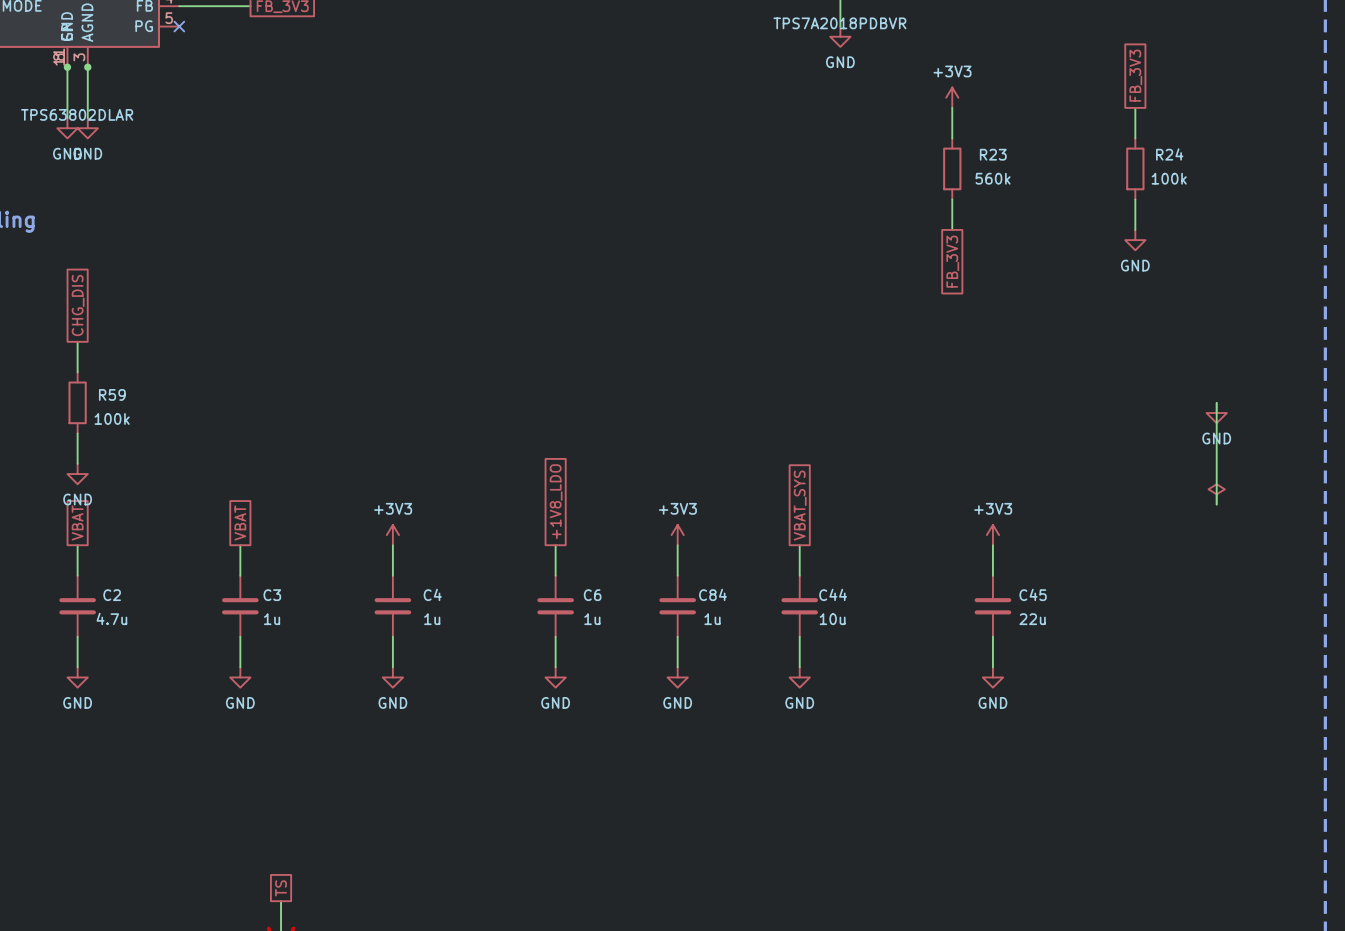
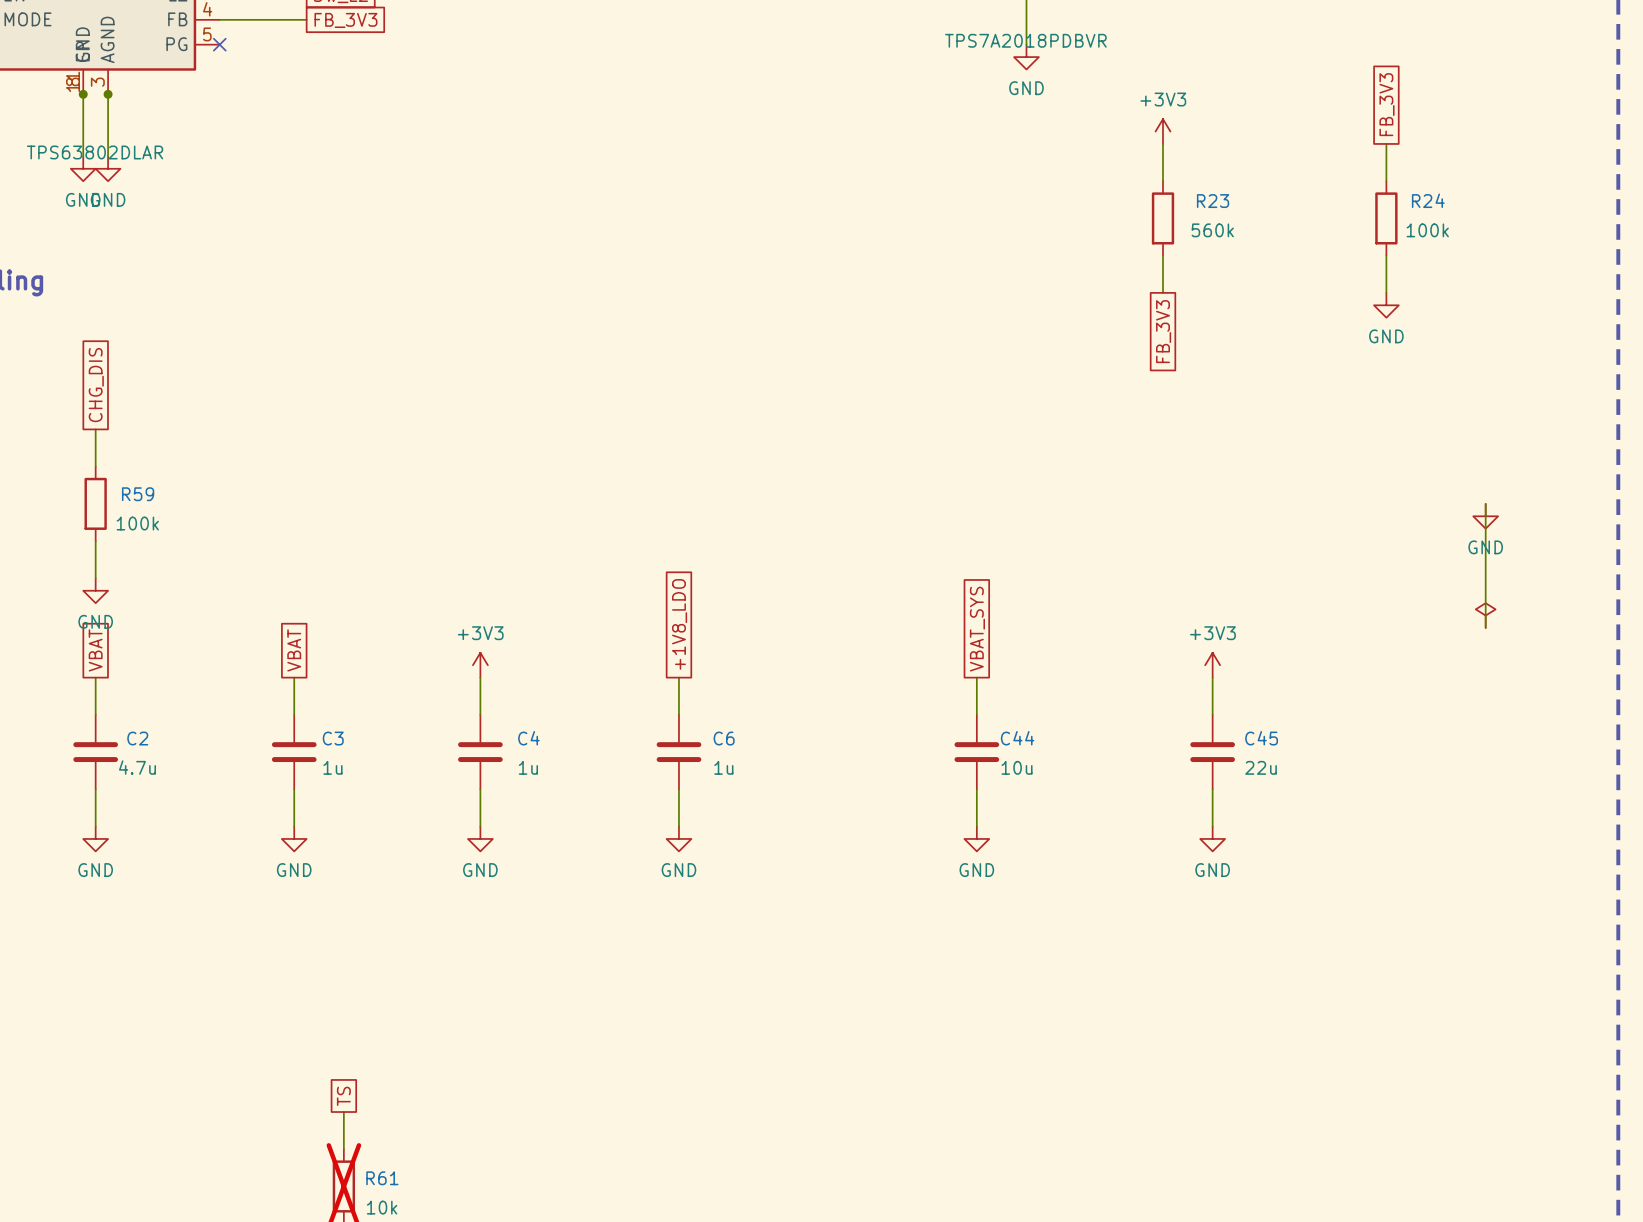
power symbol: +3V3 (677, 535) -> none
wire: (677, 545) (677, 575) -> none
C84: 1u (677, 606) -> none
wire: (677, 636) (677, 667) -> none
power symbol: GND (677, 677) -> none

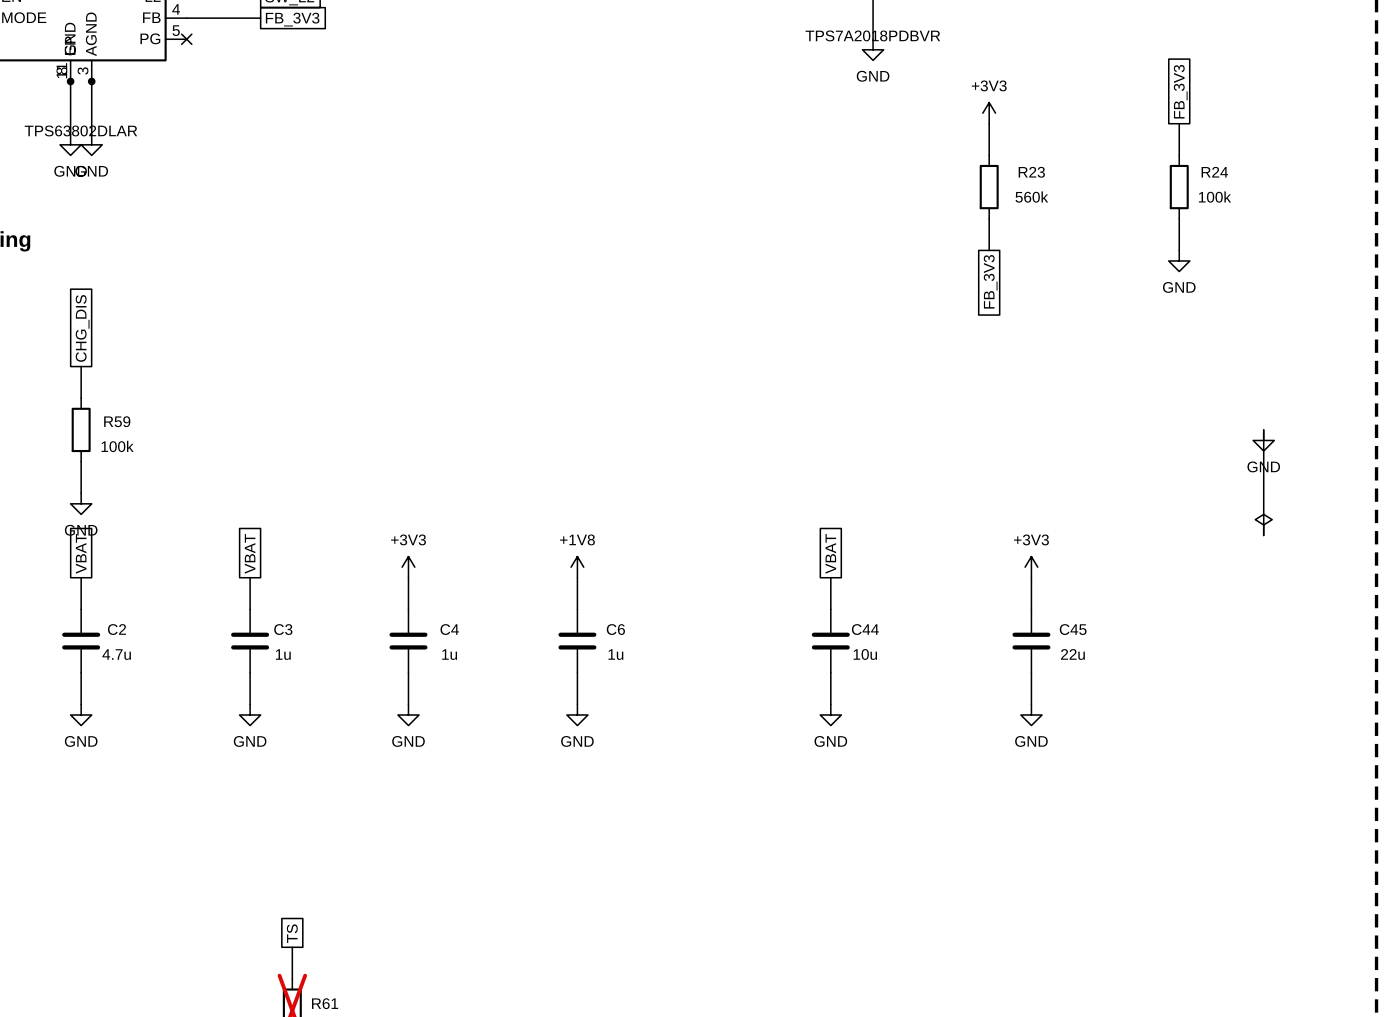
global label: +1V8_LDO (679, 624) -> none
global label: VBAT_SYS (977, 629) -> VBAT (830, 553)
power symbol: none -> +1V8 (577, 567)

